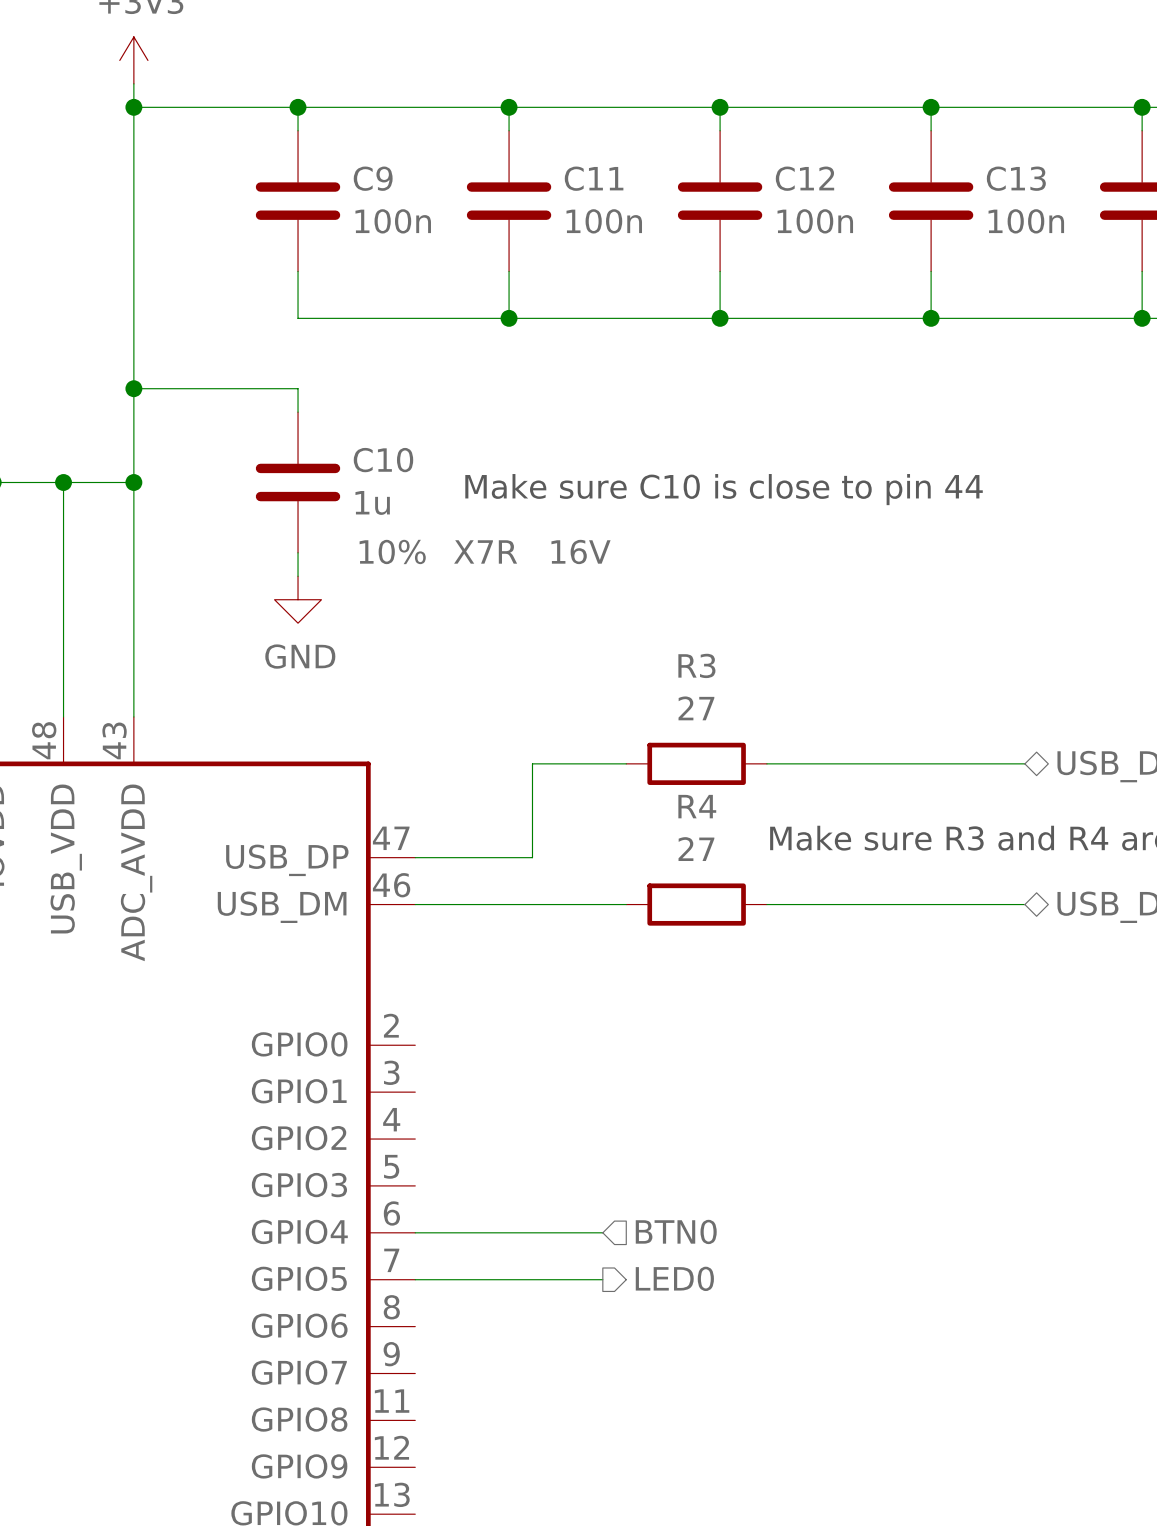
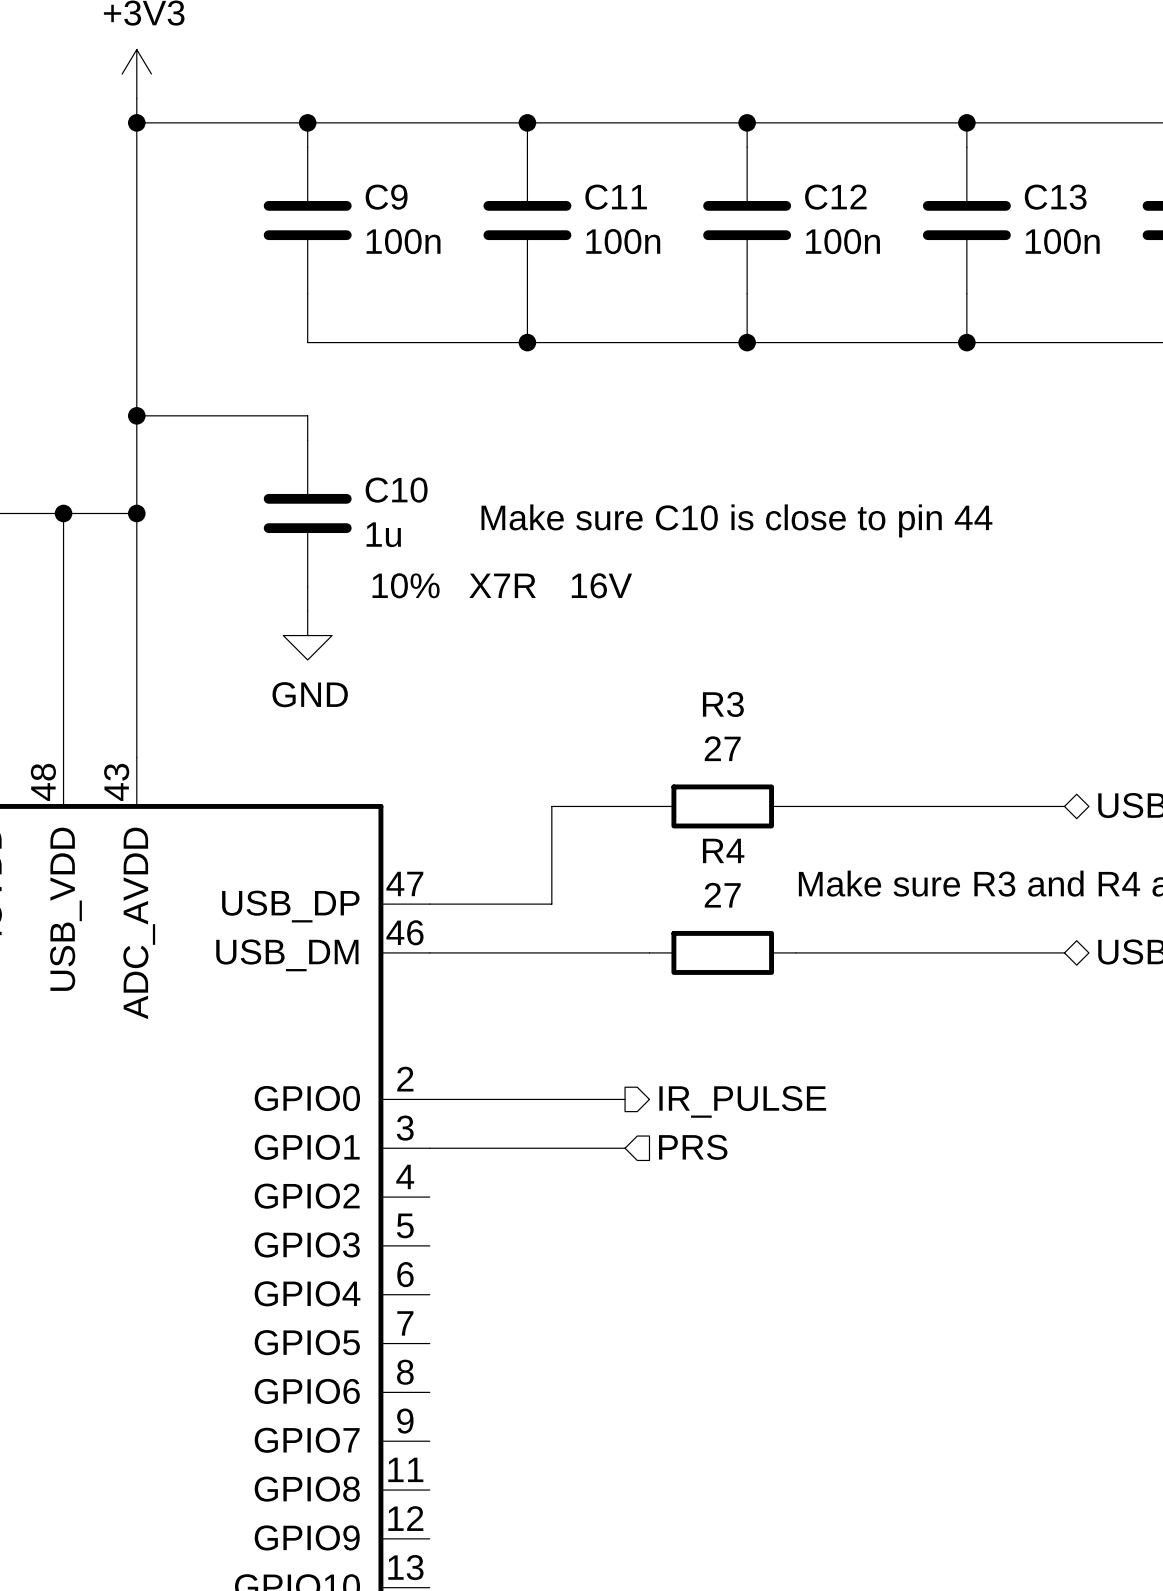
hierarchical label: none -> IR_PULSE (742, 1101)
hierarchical label: none -> PRS (693, 1147)
hierarchical label: BTN0 (676, 1231) -> none
wire: (415, 1232) (602, 1232) -> (429, 1148) (625, 1148)
hierarchical label: LED0 (674, 1278) -> none
wire: (415, 1279) (602, 1279) -> (429, 1099) (625, 1099)

